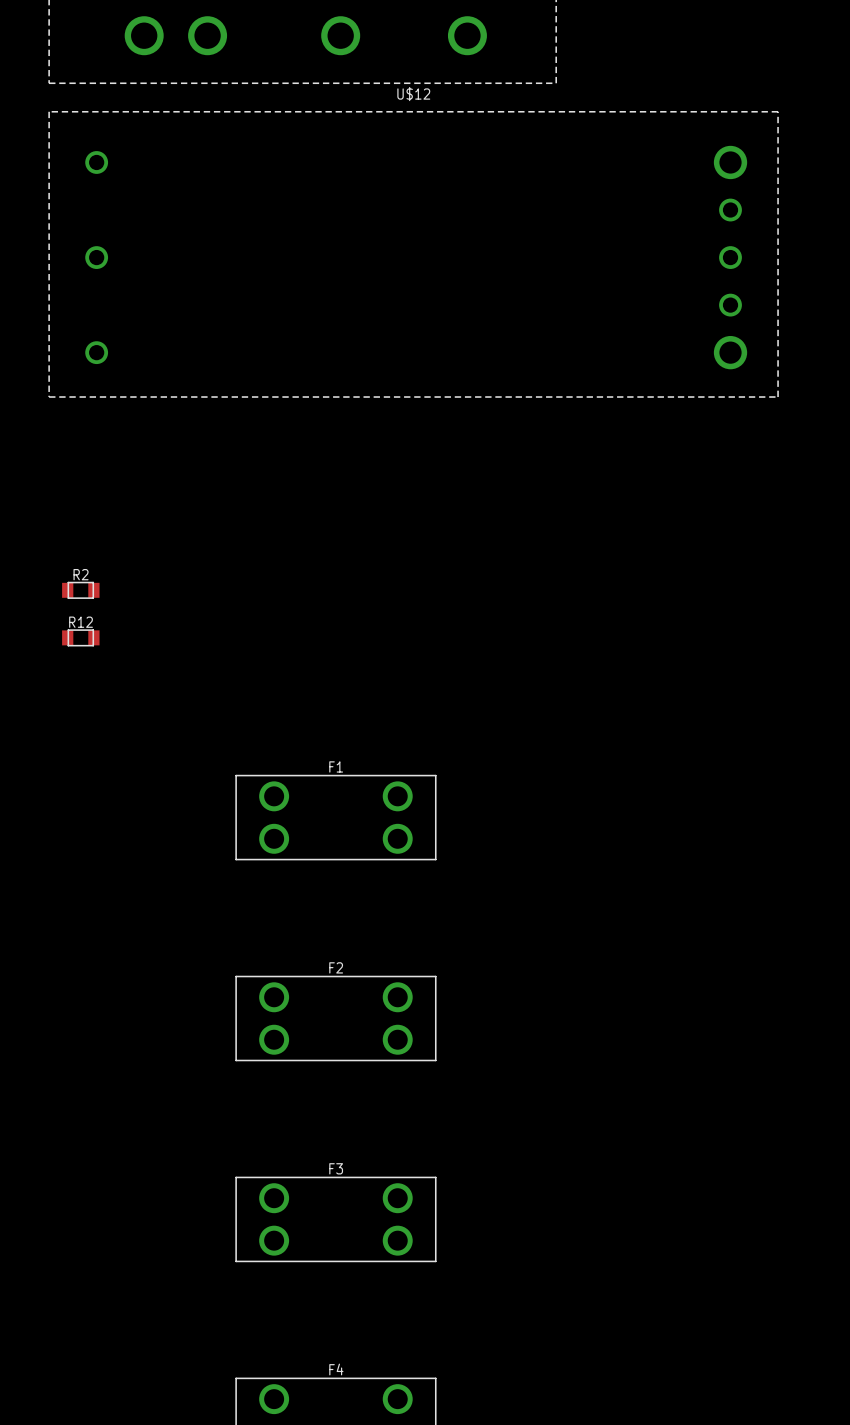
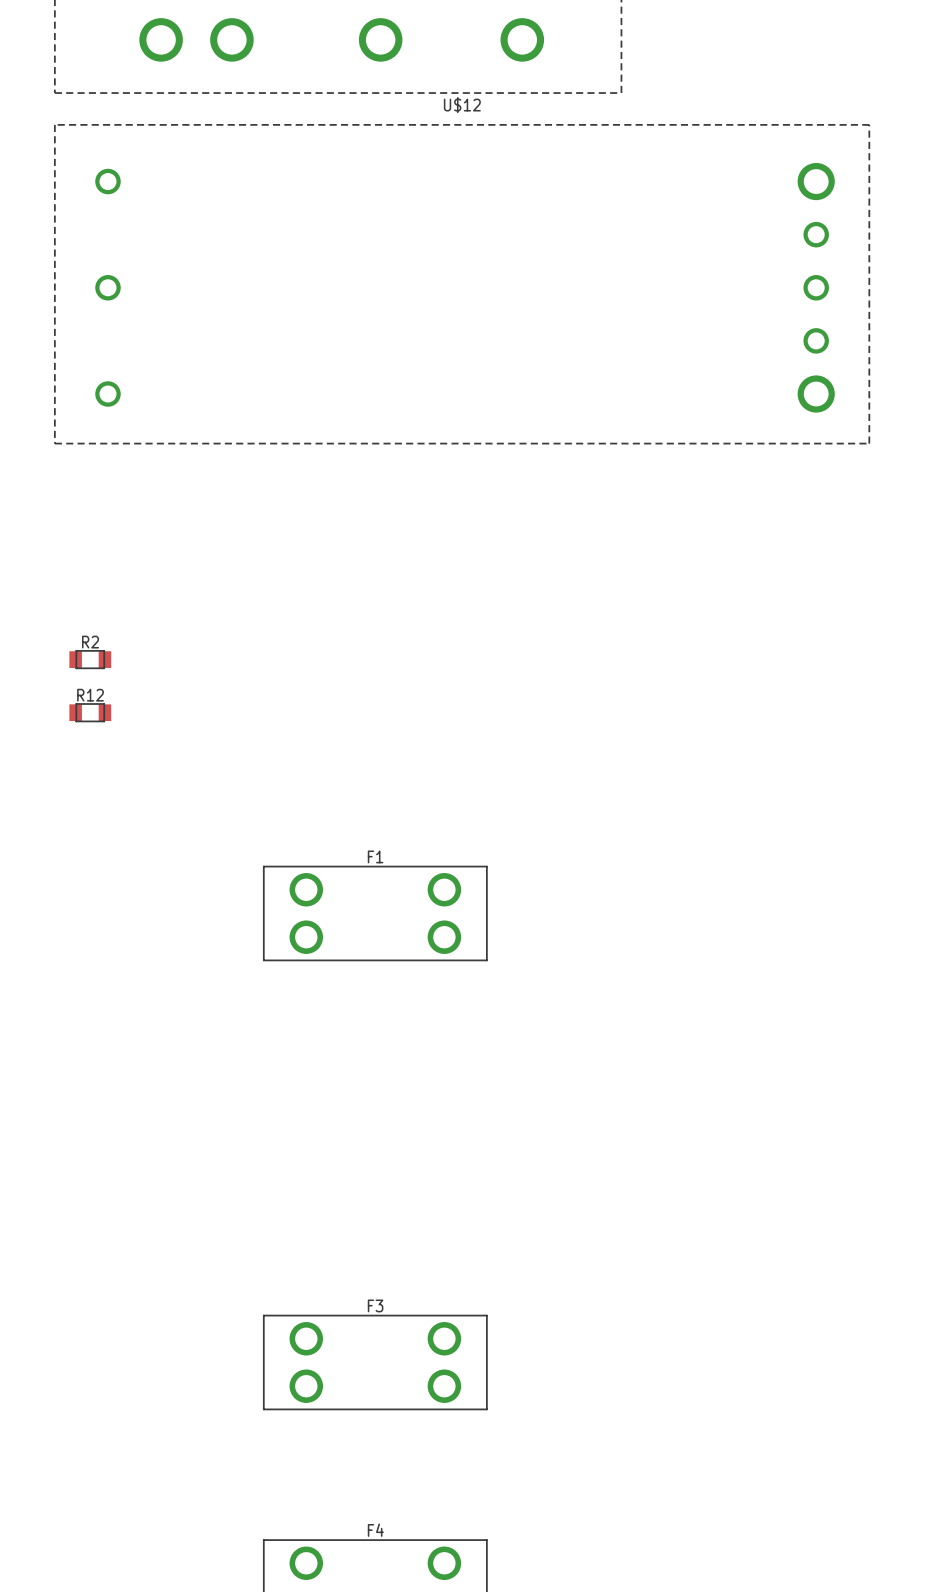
F2: (335, 1018) -> none

